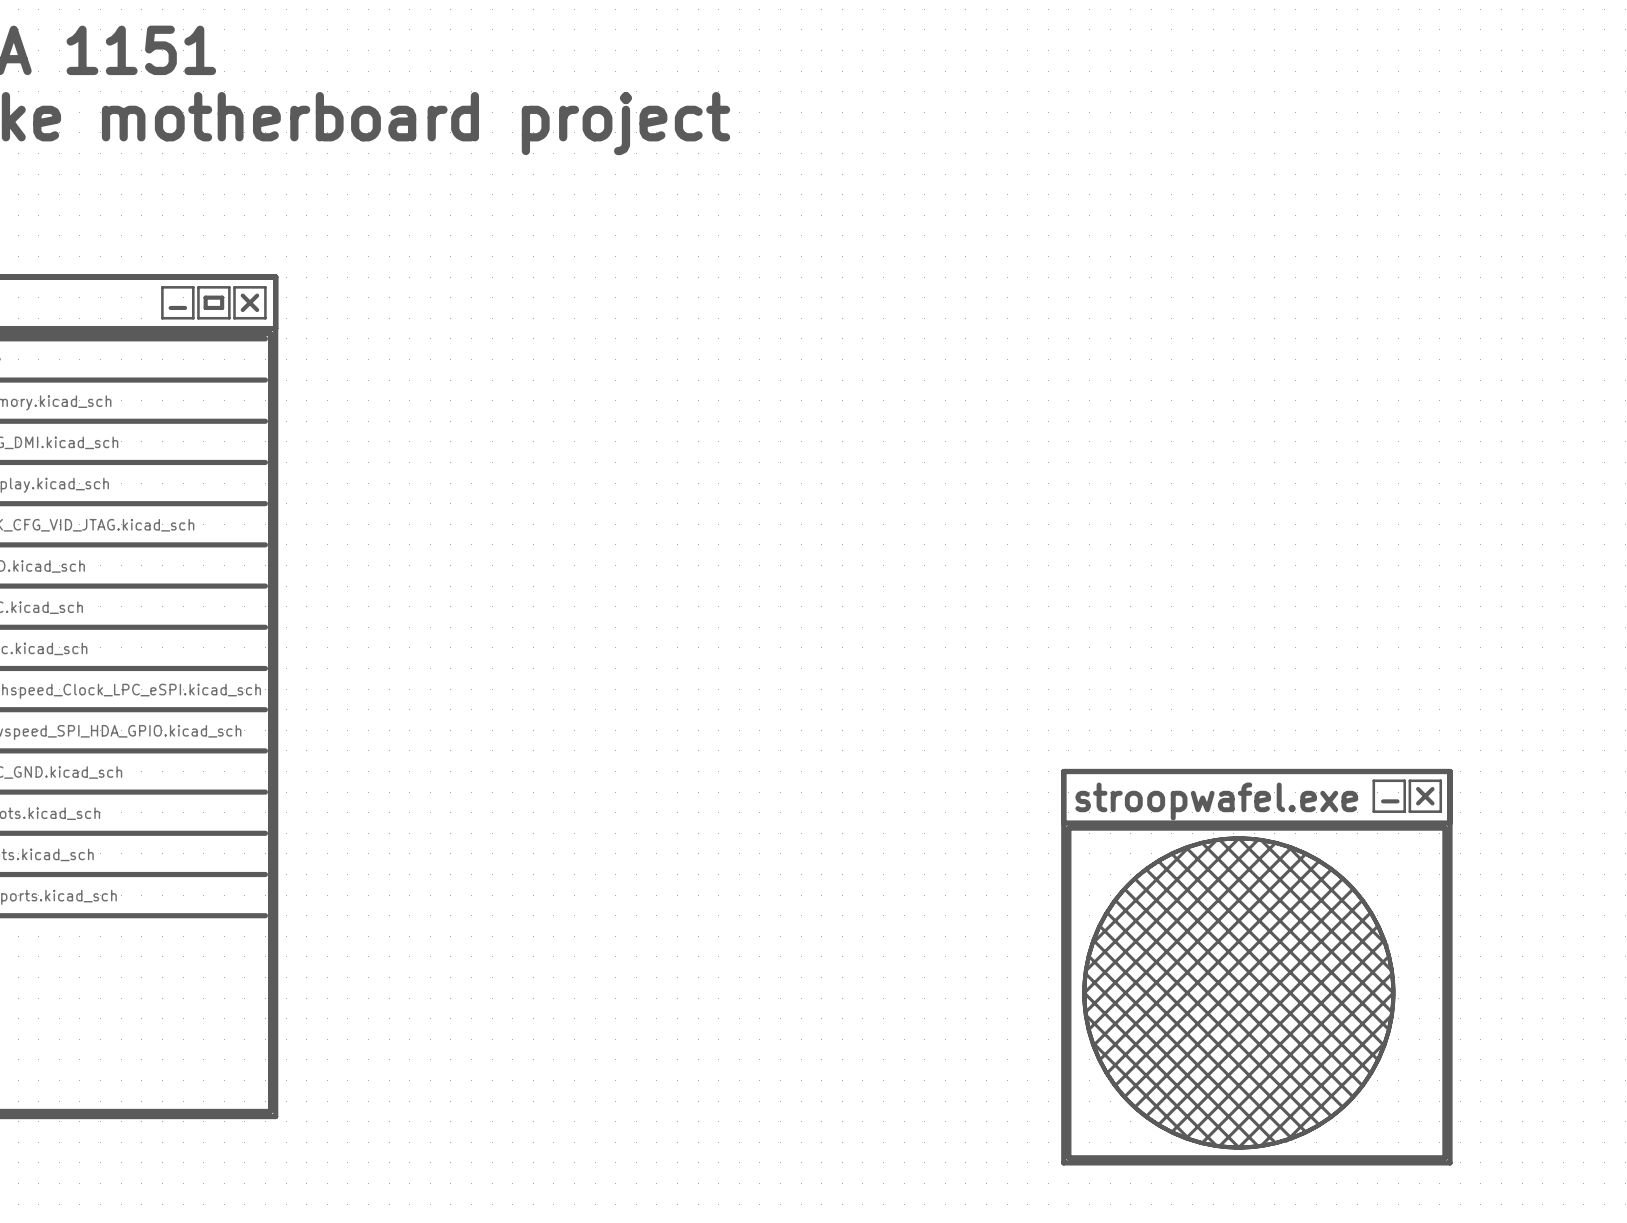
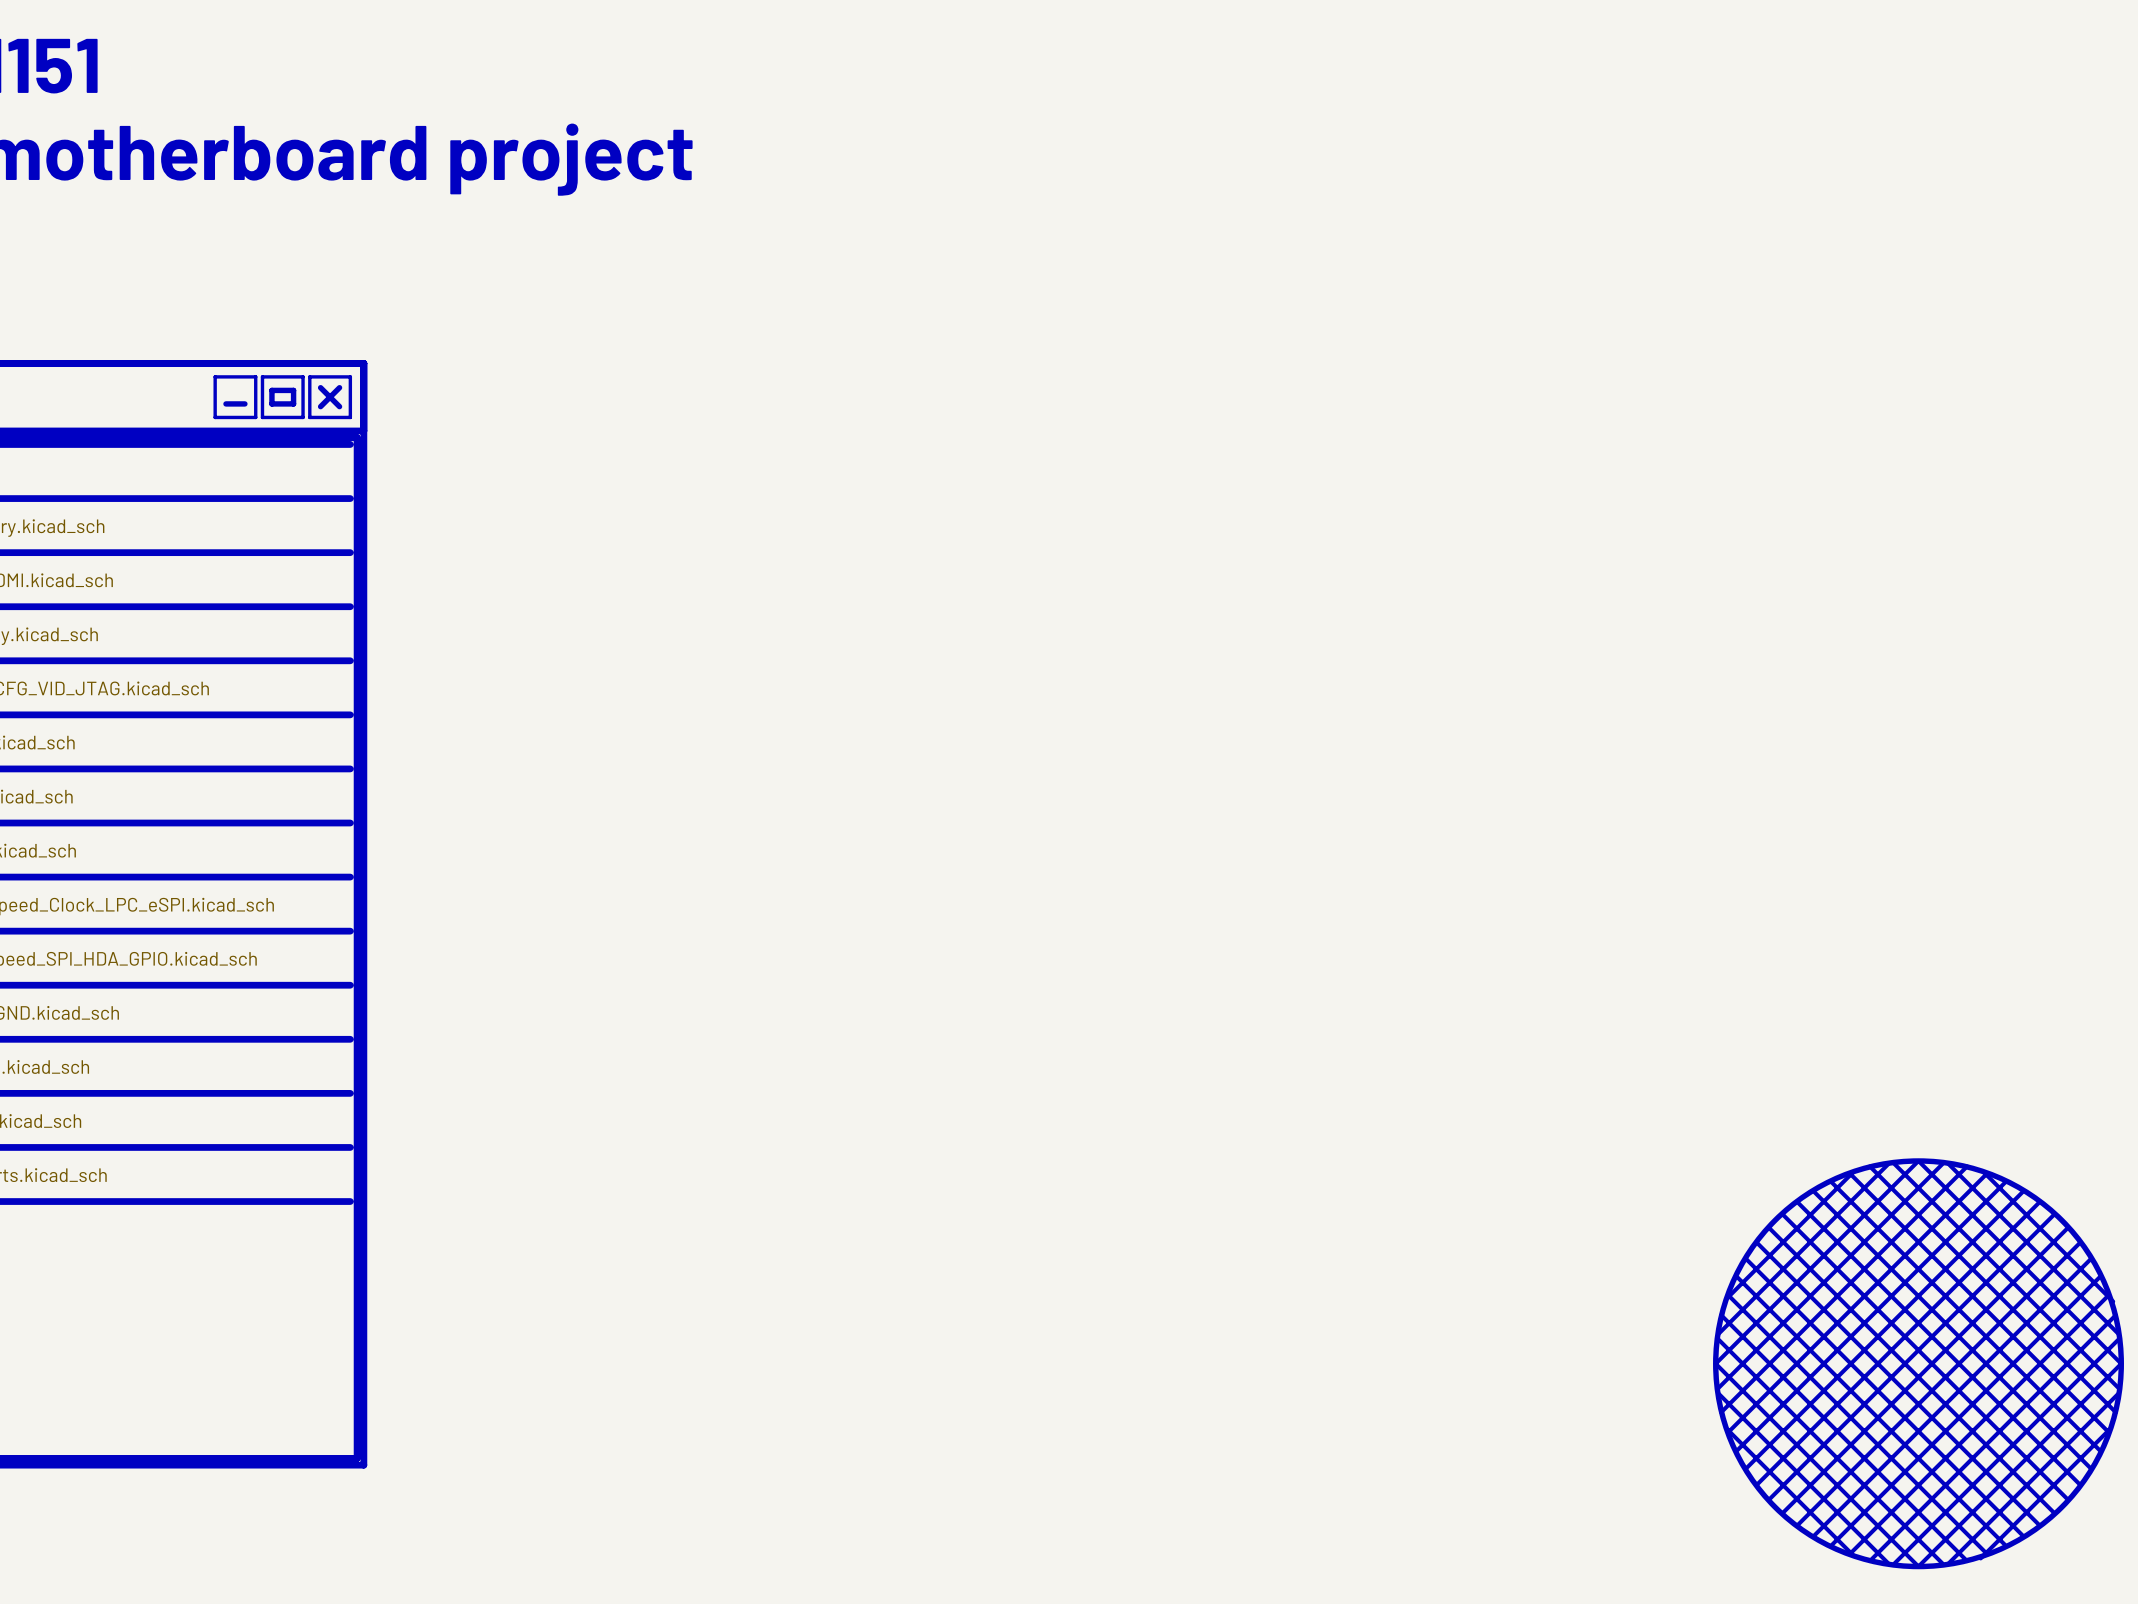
line: (1063, 771) (1450, 771) (1450, 1162) (1063, 1162) (1063, 771) -> none
line: (1373, 780) (1404, 780) (1404, 811) (1373, 811) (1373, 780) -> none
line: (1409, 780) (1440, 780) (1440, 811) (1409, 811) (1409, 780) -> none
line: (1418, 789) (1432, 803) -> none
line: (1432, 789) (1418, 803) -> none
text: stroopwafel.exe (1216, 801) -> none
line: (1383, 801) (1397, 801) -> none
line: (1063, 823) (1450, 823) -> none
line: (1068, 828) (1444, 828) (1444, 1157) (1068, 1157) (1068, 828) -> none
drawing: [1082, 836, 1396, 1150] -> none
line: (1216, 840) (1086, 970) -> none
line: (1220, 840) (1391, 1011) -> (1718, 1339) (1942, 1563)
line: (1257, 840) (1086, 1011) -> none
line: (1261, 840) (1391, 970) -> none
line: (1201, 842) (1389, 1030) -> (1721, 1315) (1967, 1561)
line: (1275, 842) (1088, 1030) -> none
line: (1189, 846) (1092, 943) -> none
line: (1288, 846) (1387, 945) -> none
line: (1187, 848) (1383, 1044) -> (1729, 1296) (1986, 1553)
line: (1290, 848) (1094, 1044) -> none
line: (1172, 854) (1376, 1058) -> (1737, 1277) (2005, 1544)
line: (1304, 854) (1100, 1058) -> none
line: (1158, 861) (1370, 1073) -> (1745, 1258) (2023, 1536)
line: (1319, 861) (1107, 1073) -> none
line: (1146, 869) (1362, 1085) -> none
line: (1331, 869) (1115, 1085) -> none
line: (1135, 879) (1352, 1095) -> none
line: (1341, 879) (1125, 1095) -> none
drawing: none -> [1713, 1158, 2124, 1570]
line: none -> (1888, 1163) (1817, 1235)
line: none -> (1894, 1163) (2118, 1388)
line: none -> (1942, 1163) (1827, 1278)
line: none -> (1948, 1163) (2118, 1334)
line: none -> (1869, 1166) (2115, 1412)
line: (1125, 889) (1341, 1106) -> none
line: (1352, 889) (1135, 1106) -> (2040, 1201) (1756, 1485)
line: none -> (1853, 1171) (1809, 1216)
line: none -> (1983, 1171) (2113, 1301)
line: none -> (1850, 1174) (2107, 1431)
line: none -> (1986, 1174) (1827, 1332)
line: (1115, 900) (1331, 1116) -> none
line: (1362, 900) (1146, 1116) -> (2053, 1215) (1769, 1498)
line: none -> (1831, 1182) (2099, 1450)
line: none -> (2005, 1182) (1819, 1367)
line: none -> (1813, 1190) (2091, 1469)
line: (1107, 912) (1319, 1124) -> none
line: (1370, 912) (1158, 1124) -> (2023, 1190) (1745, 1469)
line: none -> (1796, 1201) (2080, 1485)
line: none -> (1783, 1215) (2067, 1498)
line: (1100, 927) (1304, 1131) -> none
line: none -> (1769, 1228) (2053, 1512)
line: none -> (2067, 1228) (1783, 1512)
line: (1094, 941) (1290, 1137) -> none
line: none -> (1756, 1242) (2040, 1525)
line: none -> (2080, 1242) (1796, 1525)
line: (1088, 955) (1275, 1143) -> none
line: none -> (2091, 1258) (1813, 1536)
line: none -> (2099, 1277) (1831, 1544)
line: (1086, 974) (1257, 1145) -> none
line: none -> (2107, 1296) (1850, 1553)
line: (1314, 989) (1172, 1131) -> none
line: (1393, 992) (1238, 838) (1084, 992) (1238, 1147) (1309, 1076) -> (1830, 1302) (1967, 1166)
line: none -> (2115, 1315) (1869, 1561)
line: (1086, 1015) (1216, 1145) -> none
line: (1307, 1016) (1187, 1137) -> none
line: none -> (2118, 1339) (1894, 1563)
line: (1305, 1039) (1201, 1143) -> (1715, 1363) (1918, 1566) (2121, 1363) (1918, 1160) (1825, 1254)
line: (1092, 1042) (1189, 1139) -> none
line: (1307, 1057) (1220, 1145) -> none
line: none -> (1718, 1393) (1888, 1563)
line: none -> (2118, 1393) (1948, 1563)
line: none -> (1726, 1428) (1853, 1555)
line: none -> (2110, 1428) (1980, 1558)
line: (1316, 1090) (1261, 1145) -> none
line: (1322, 1105) (1286, 1141) -> none

